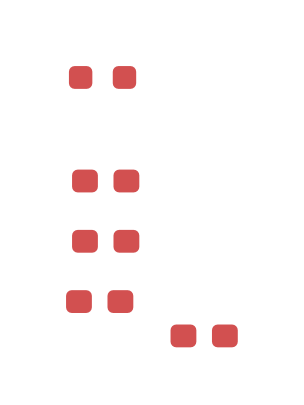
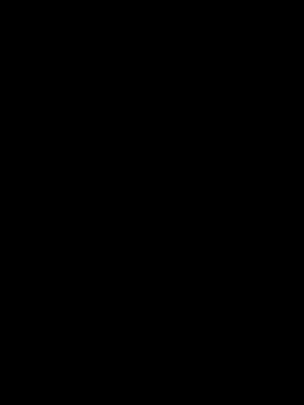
part: (102, 77) -> none
part: (105, 181) -> none
part: (105, 241) -> none
part: (99, 301) -> none
part: (204, 335) -> none

